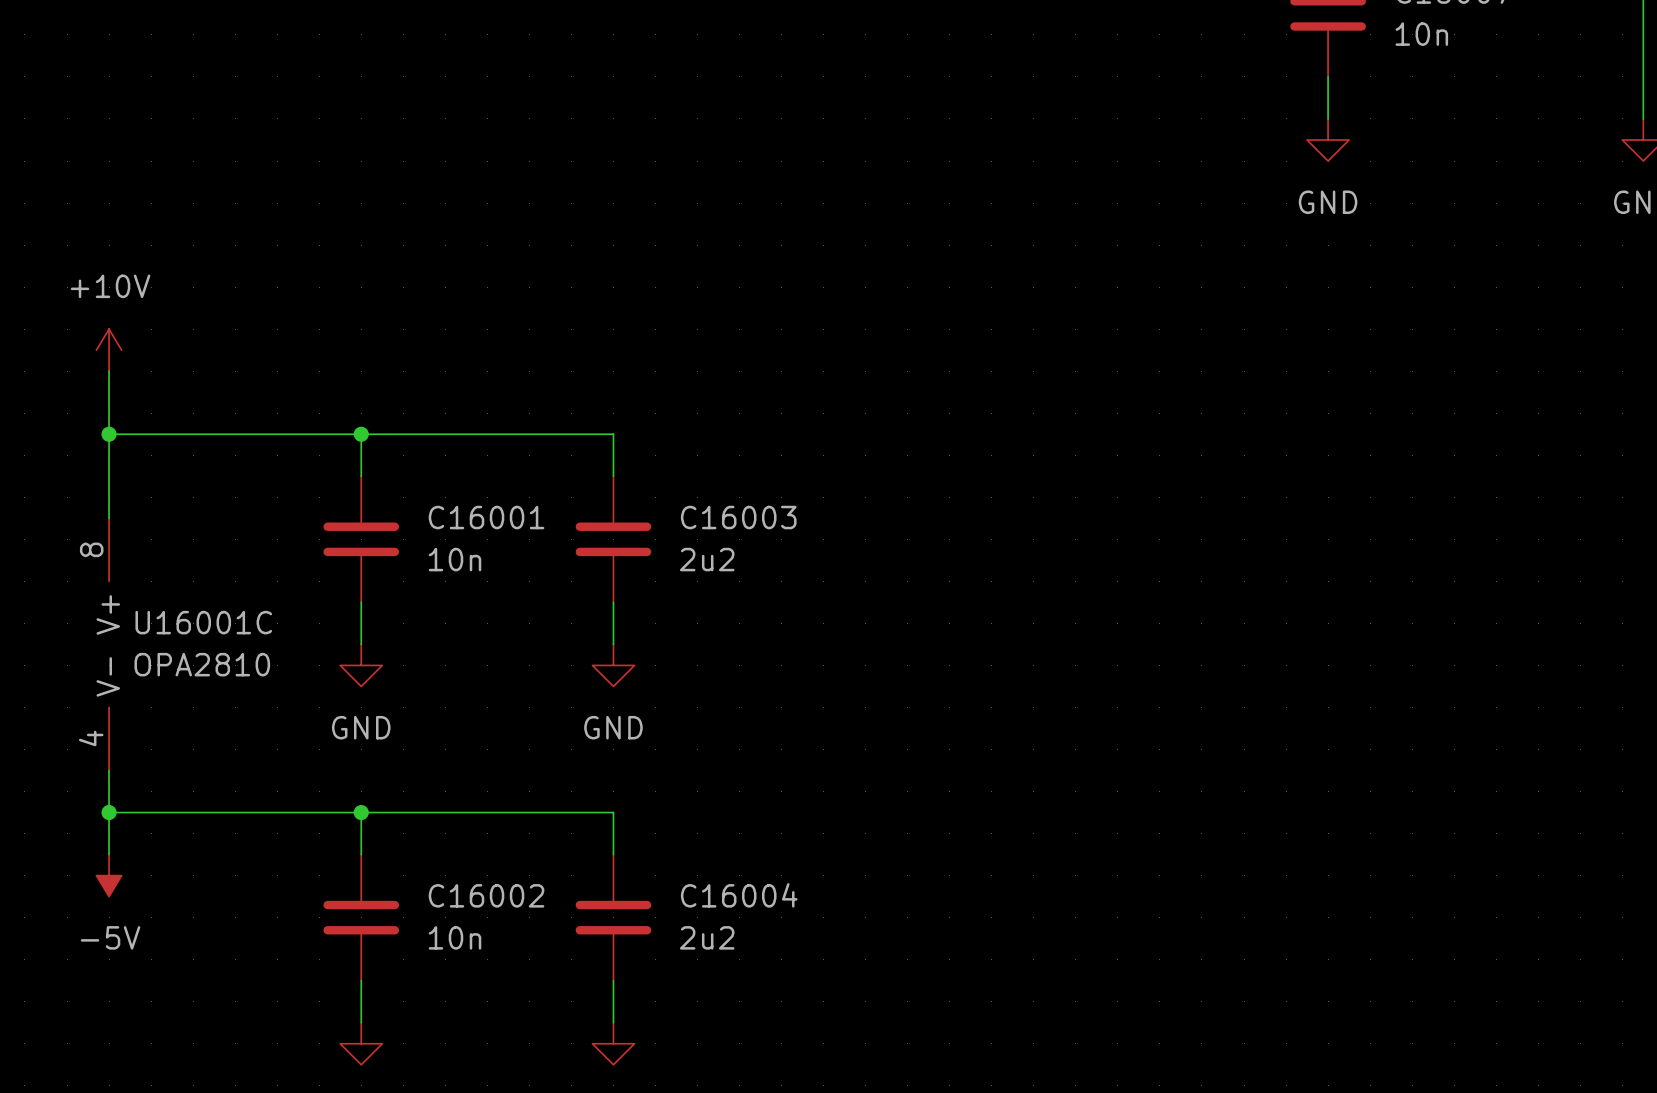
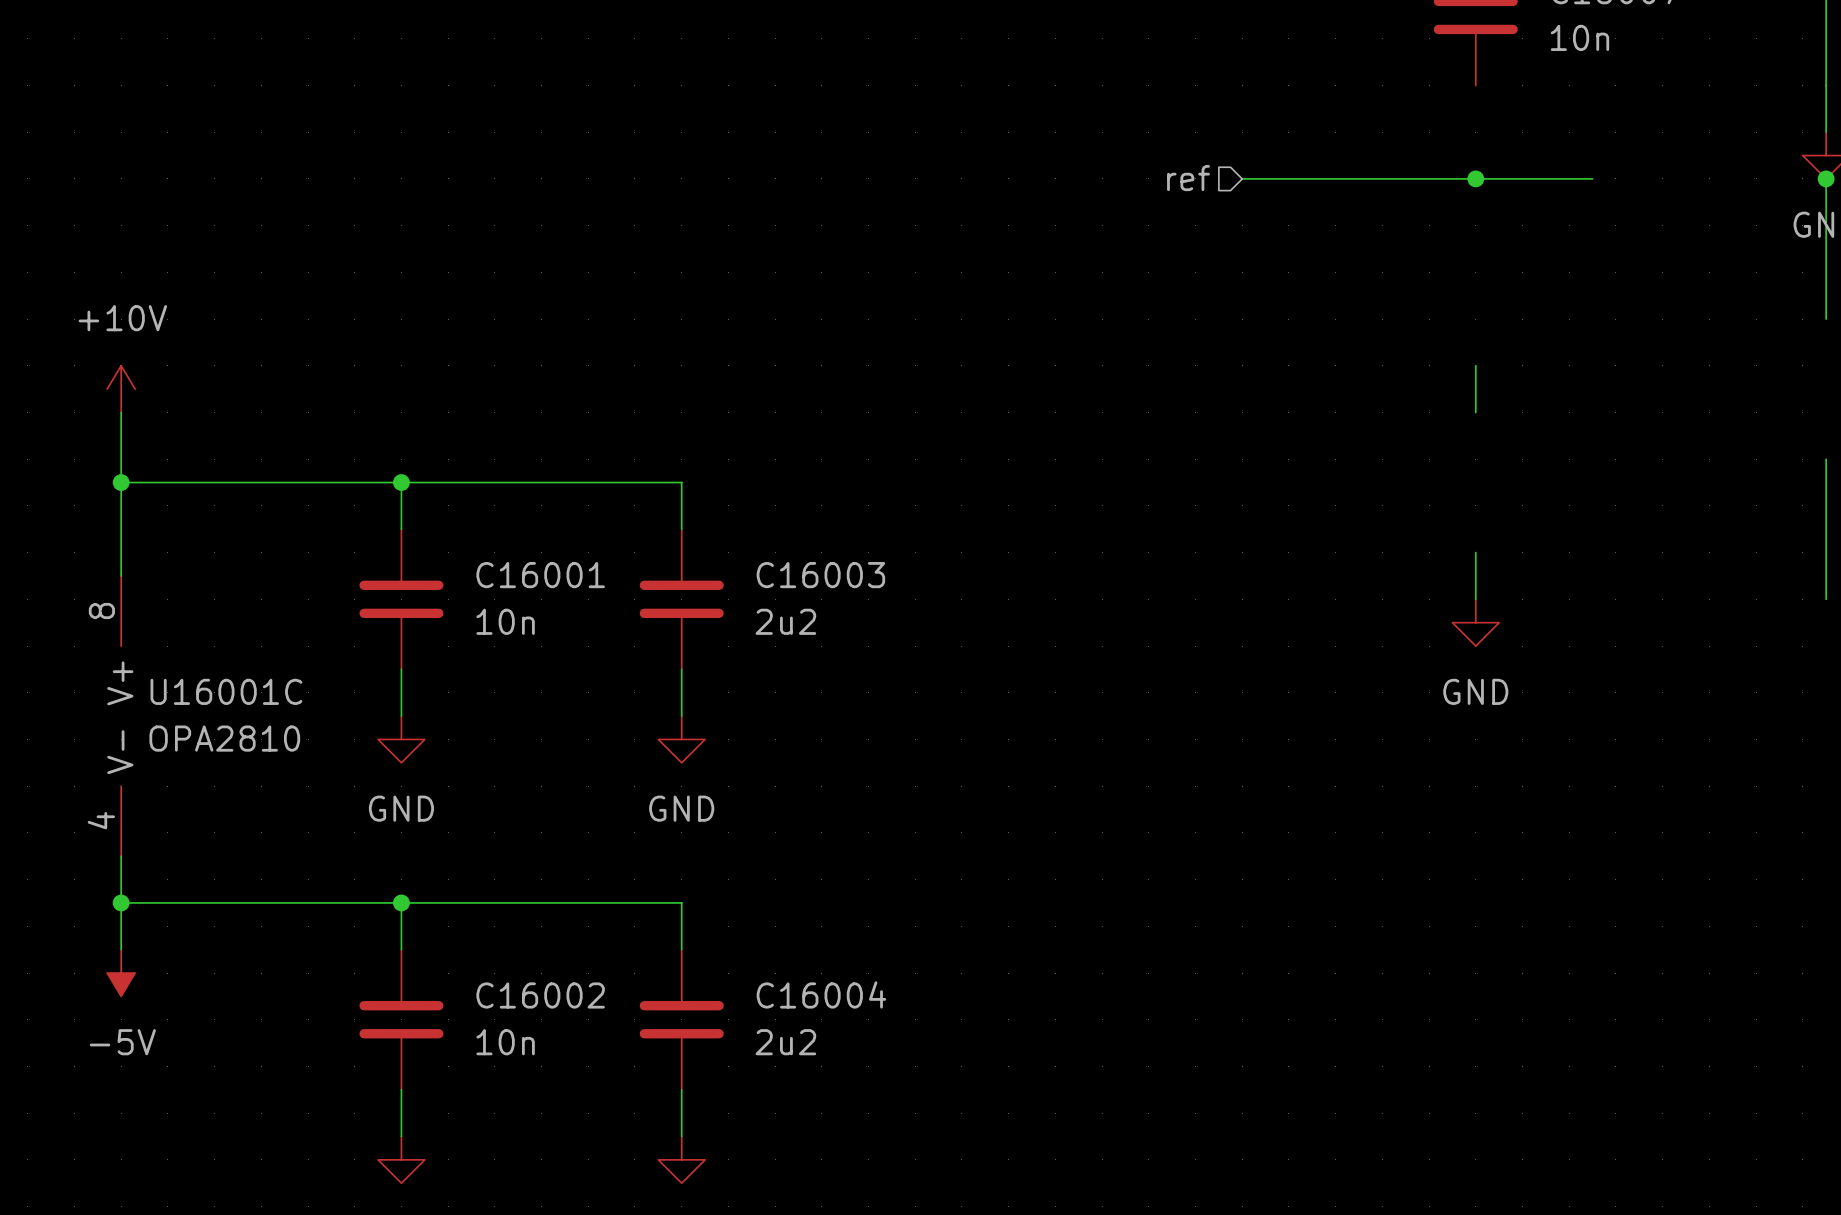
wire: (1328, 76) (1328, 118) -> (1475, 365) (1475, 412)
power symbol: GND (1328, 139) -> none
hierarchical label: none -> ref (1188, 178)
wire: none -> (1242, 178) (1592, 178)
junction: none -> (1475, 178)
wire: none -> (1826, 178) (1826, 319)
junction: none -> (1826, 178)
wire: none -> (1826, 459) (1826, 599)
wire: none -> (1475, 552) (1475, 599)
power symbol: none -> GND (1475, 622)

